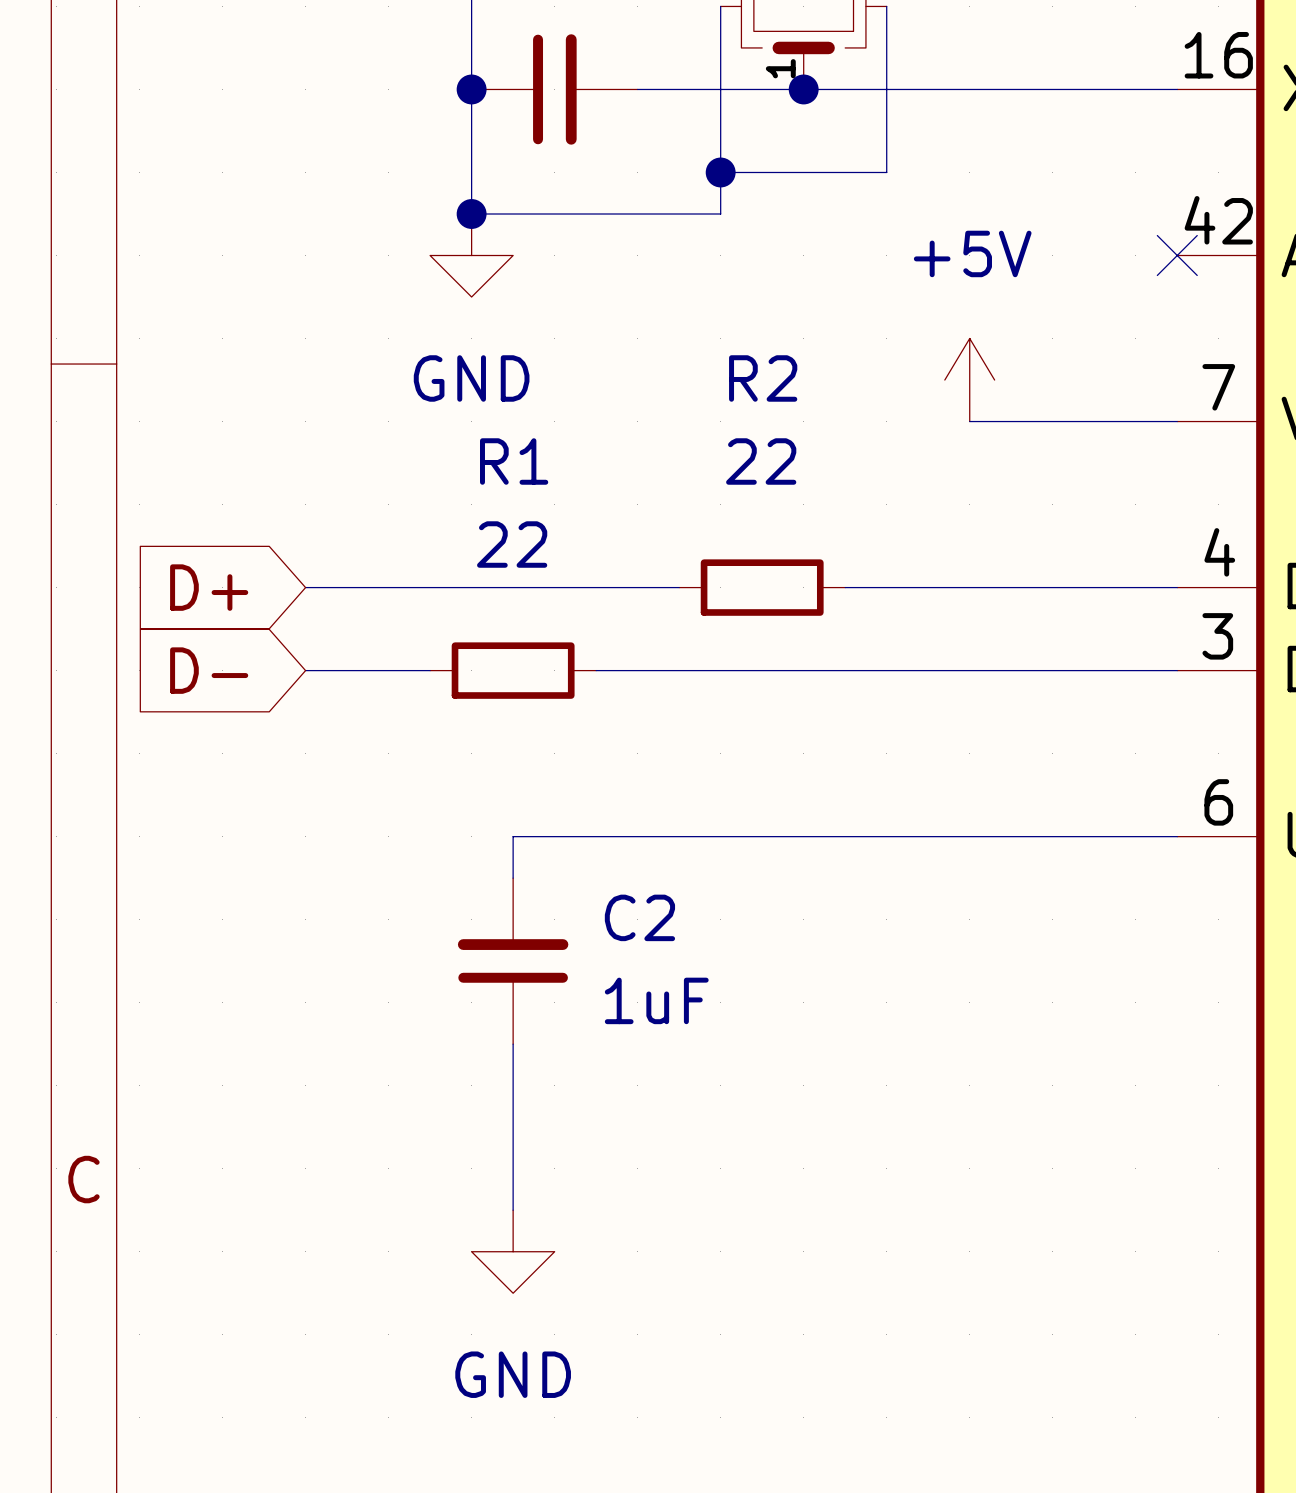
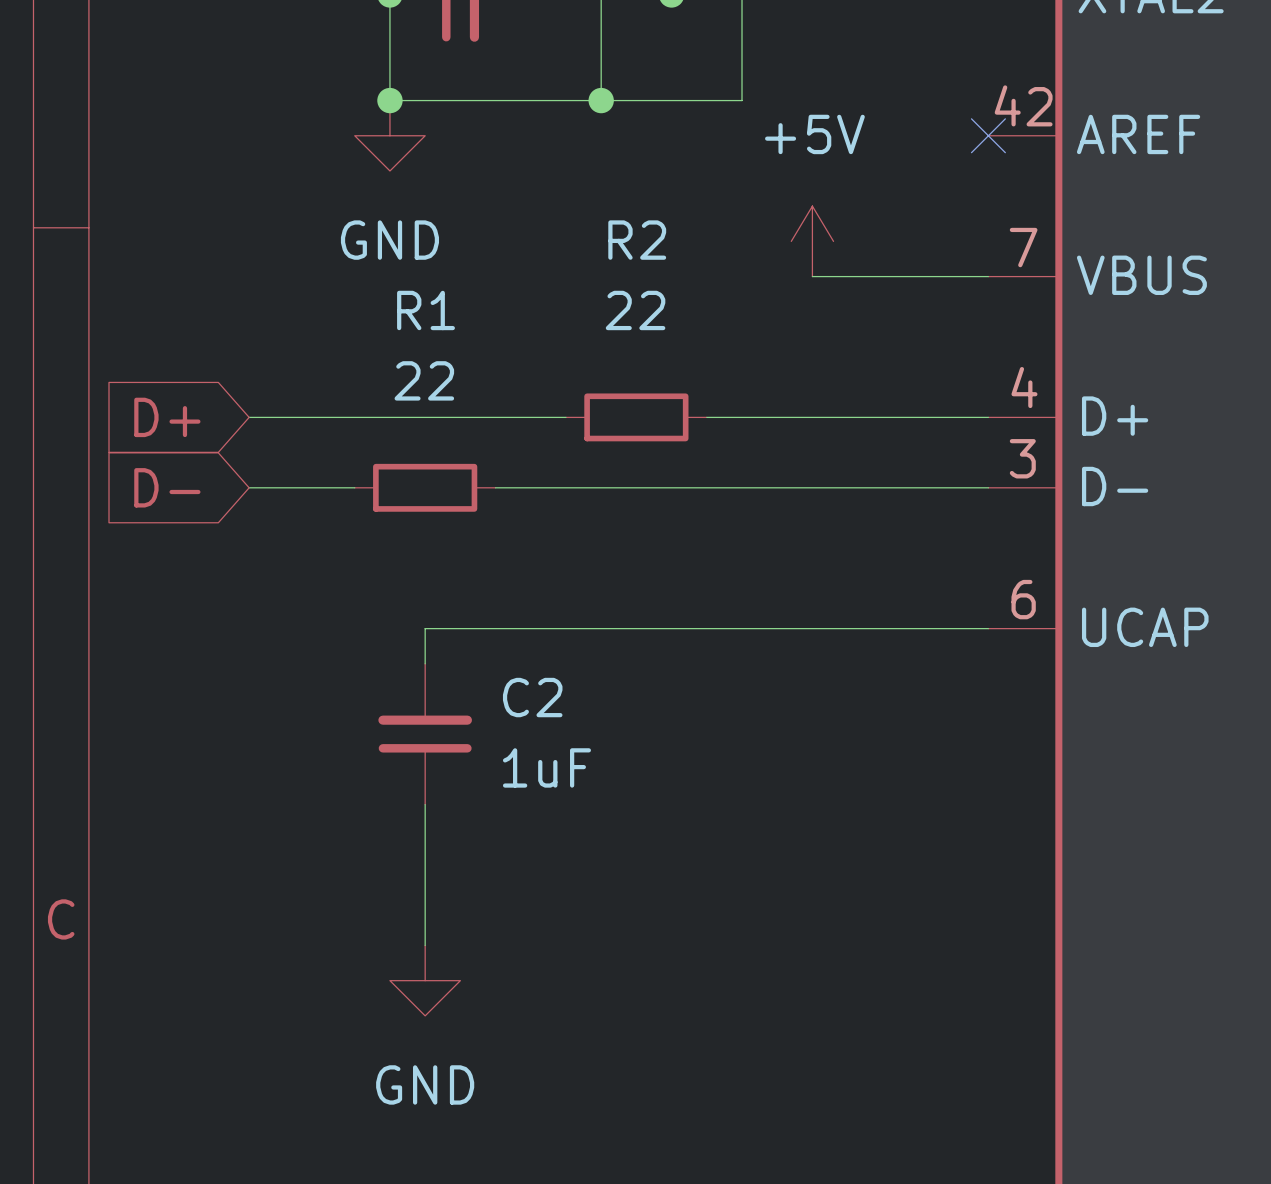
wire: (720, 172) (886, 172) -> (601, 100) (742, 100) (742, 65)
junction position: (720, 172) -> (601, 100)

